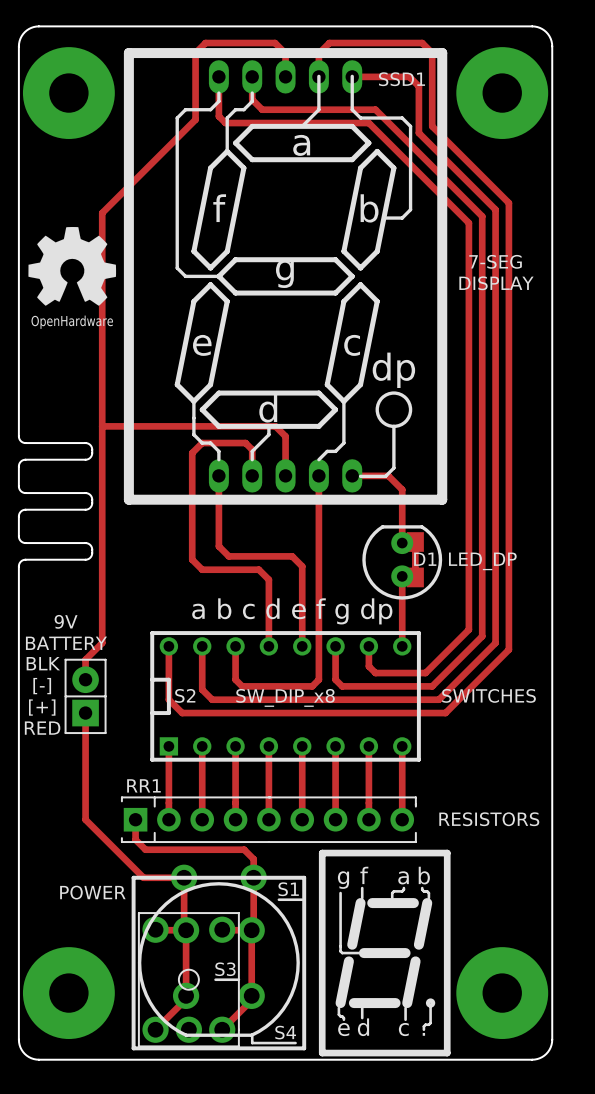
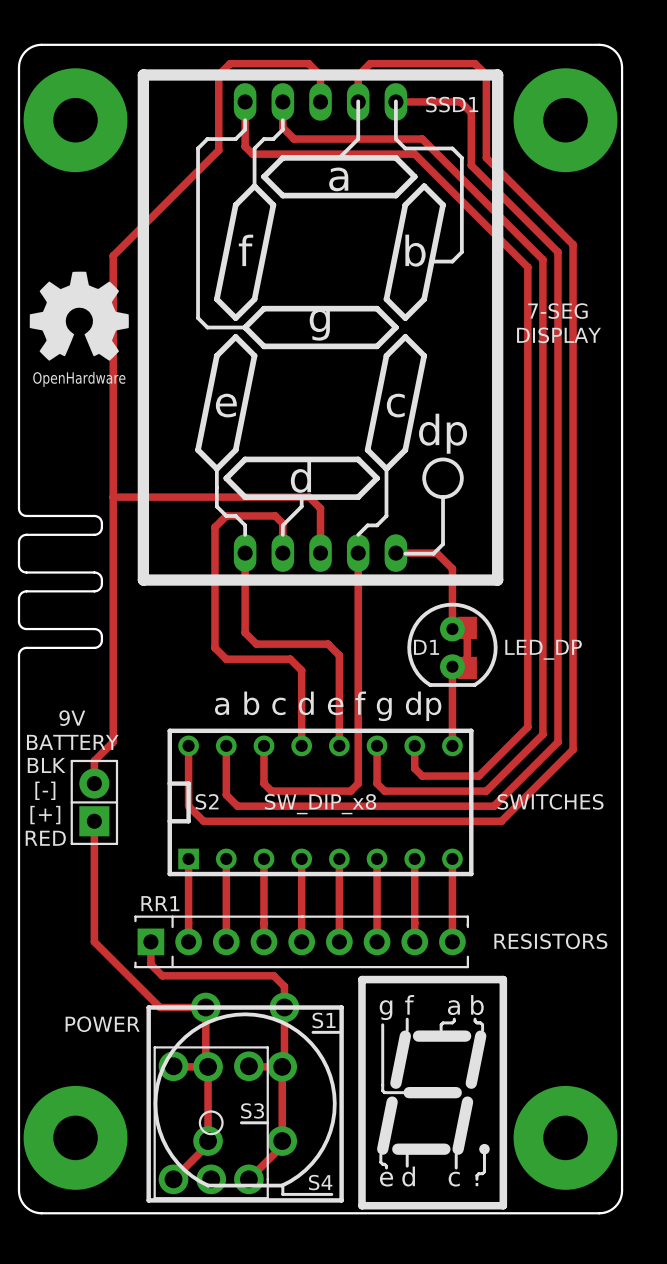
D1 footprint: [362, 525, 443, 600] -> [407, 602, 498, 687]
D1 name position: D1 (425, 559) -> D1 (426, 647)

